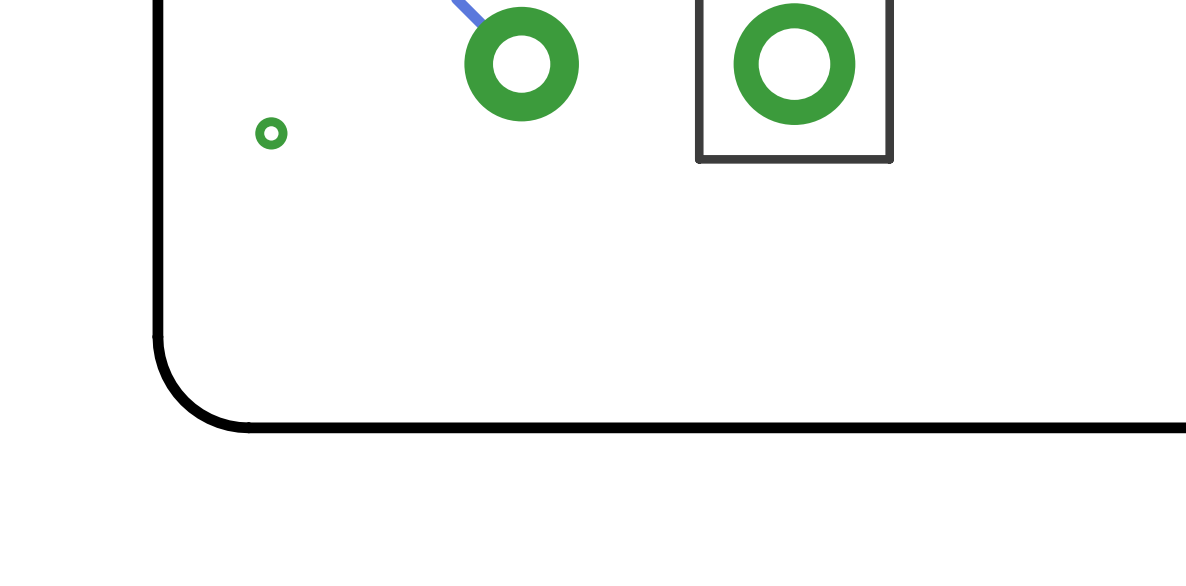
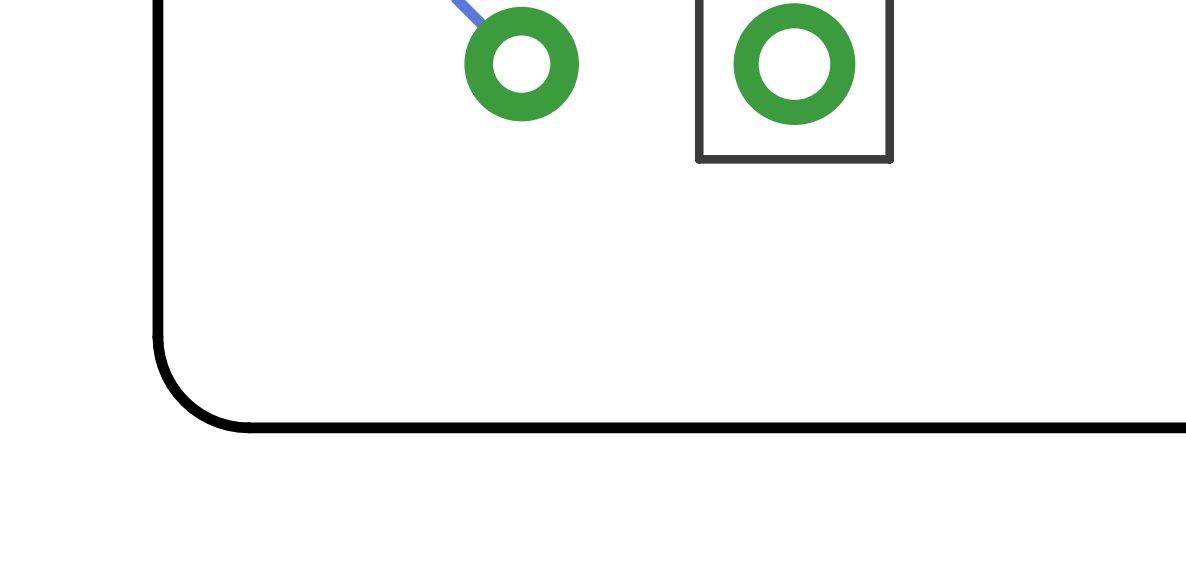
via: (271, 133) -> none

